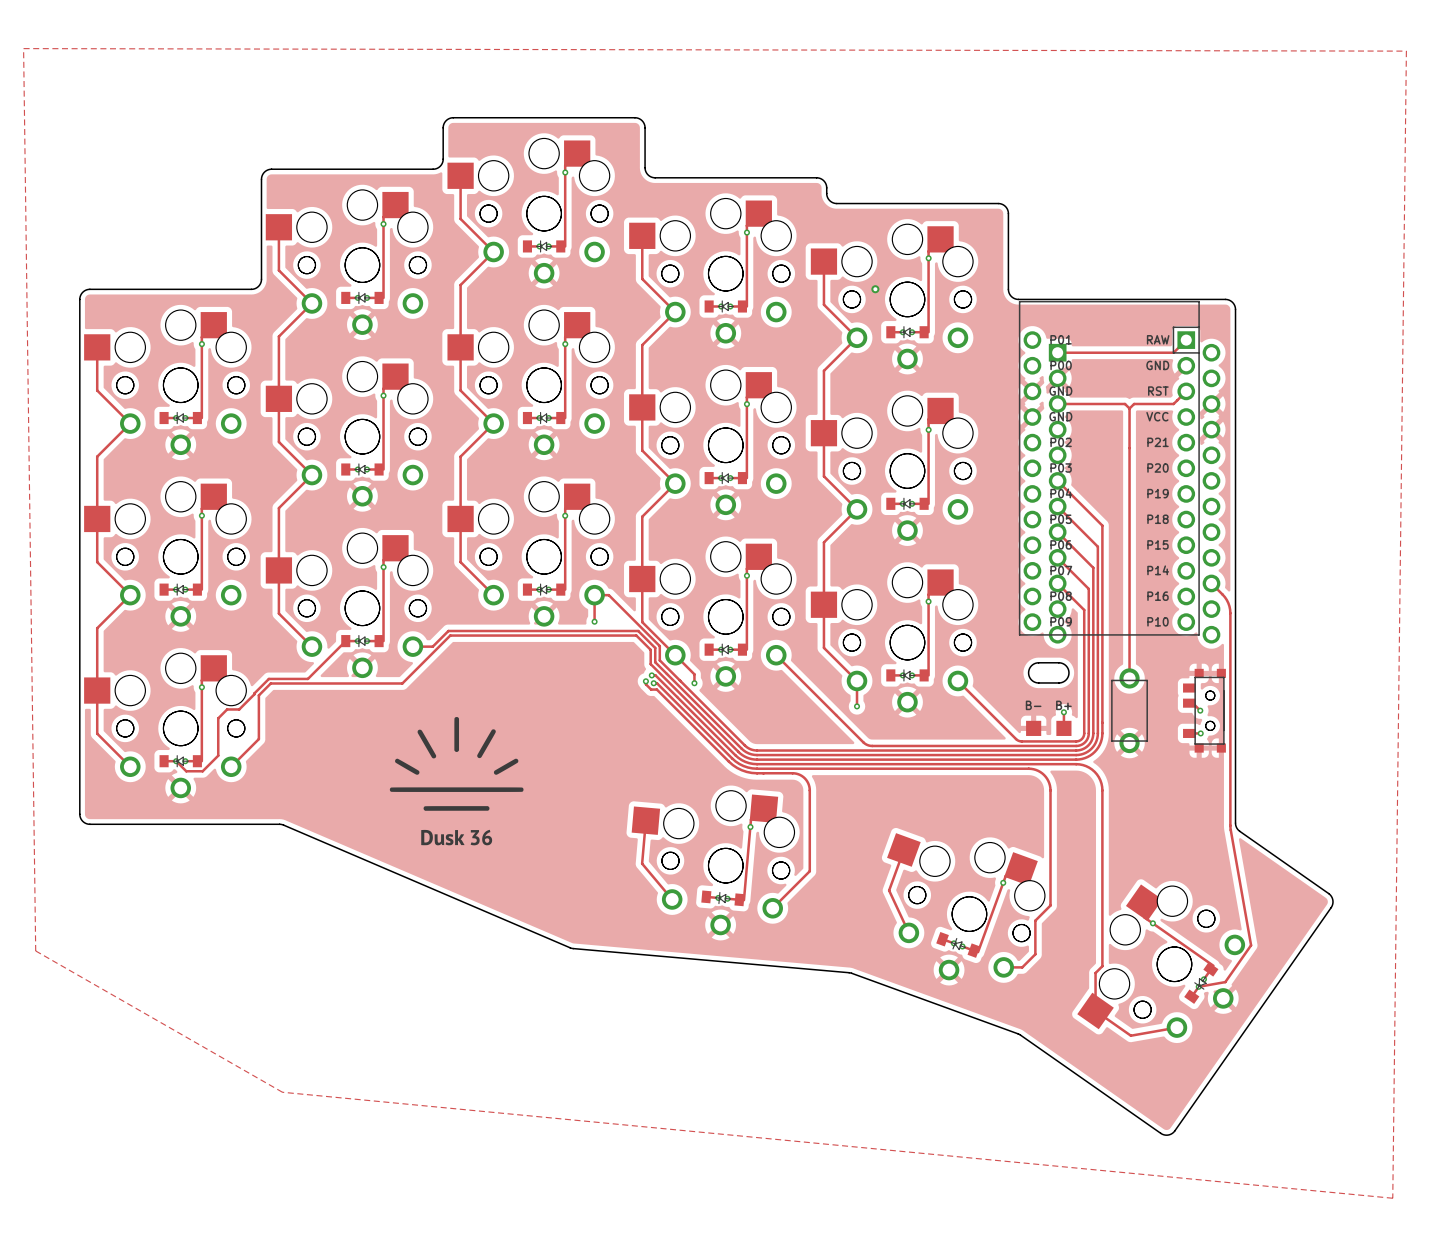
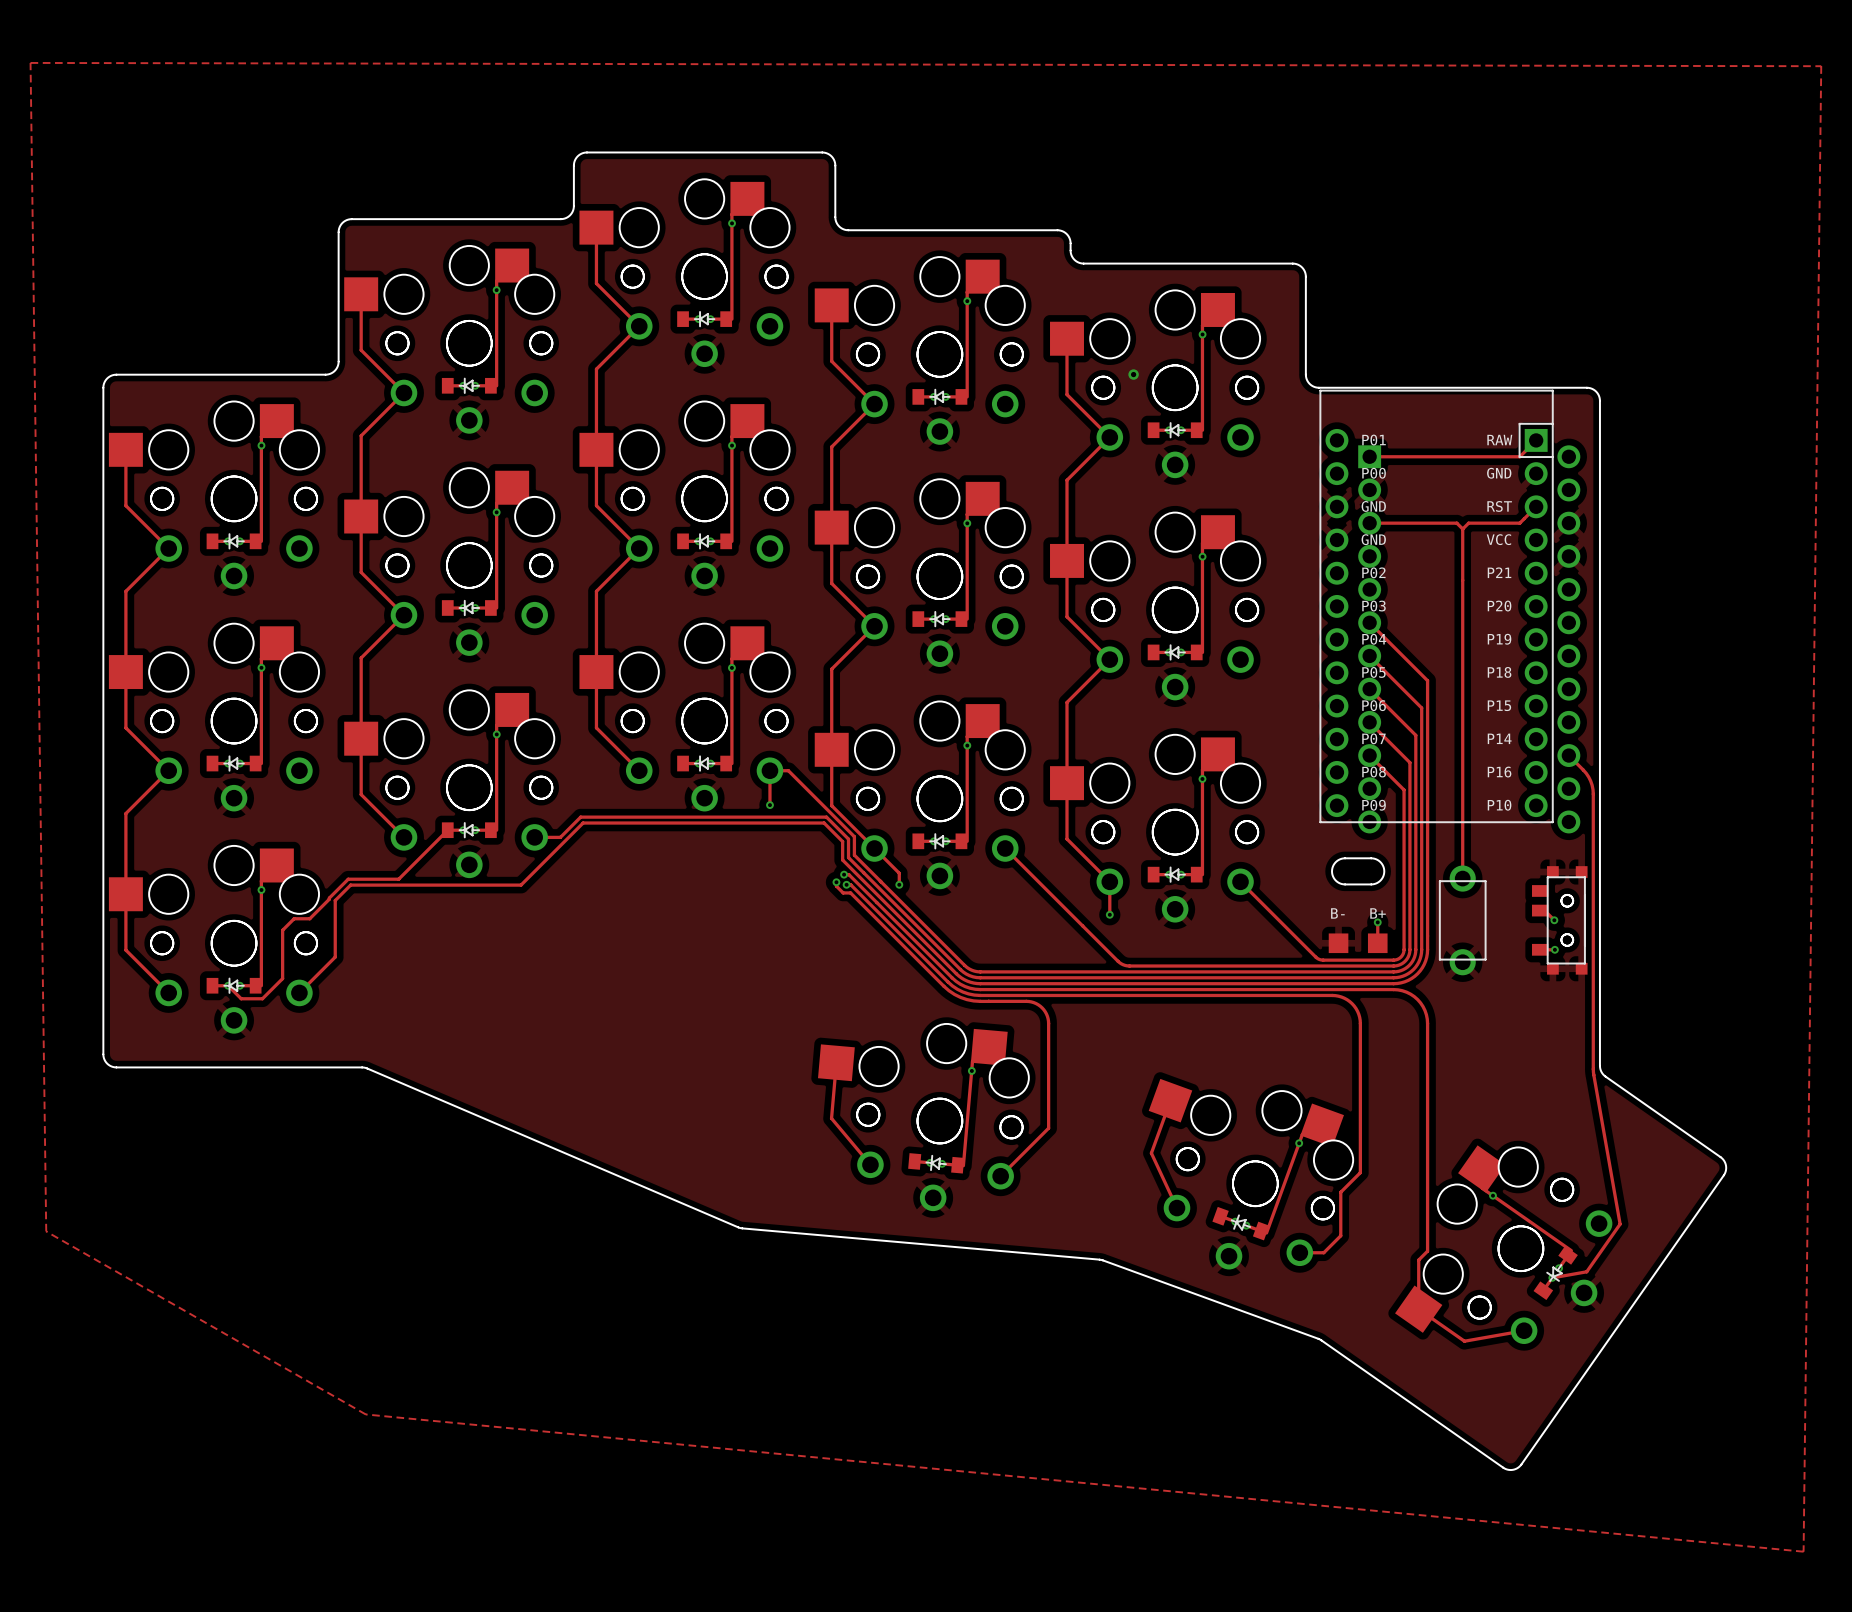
drawing: [389, 717, 524, 846] -> none

